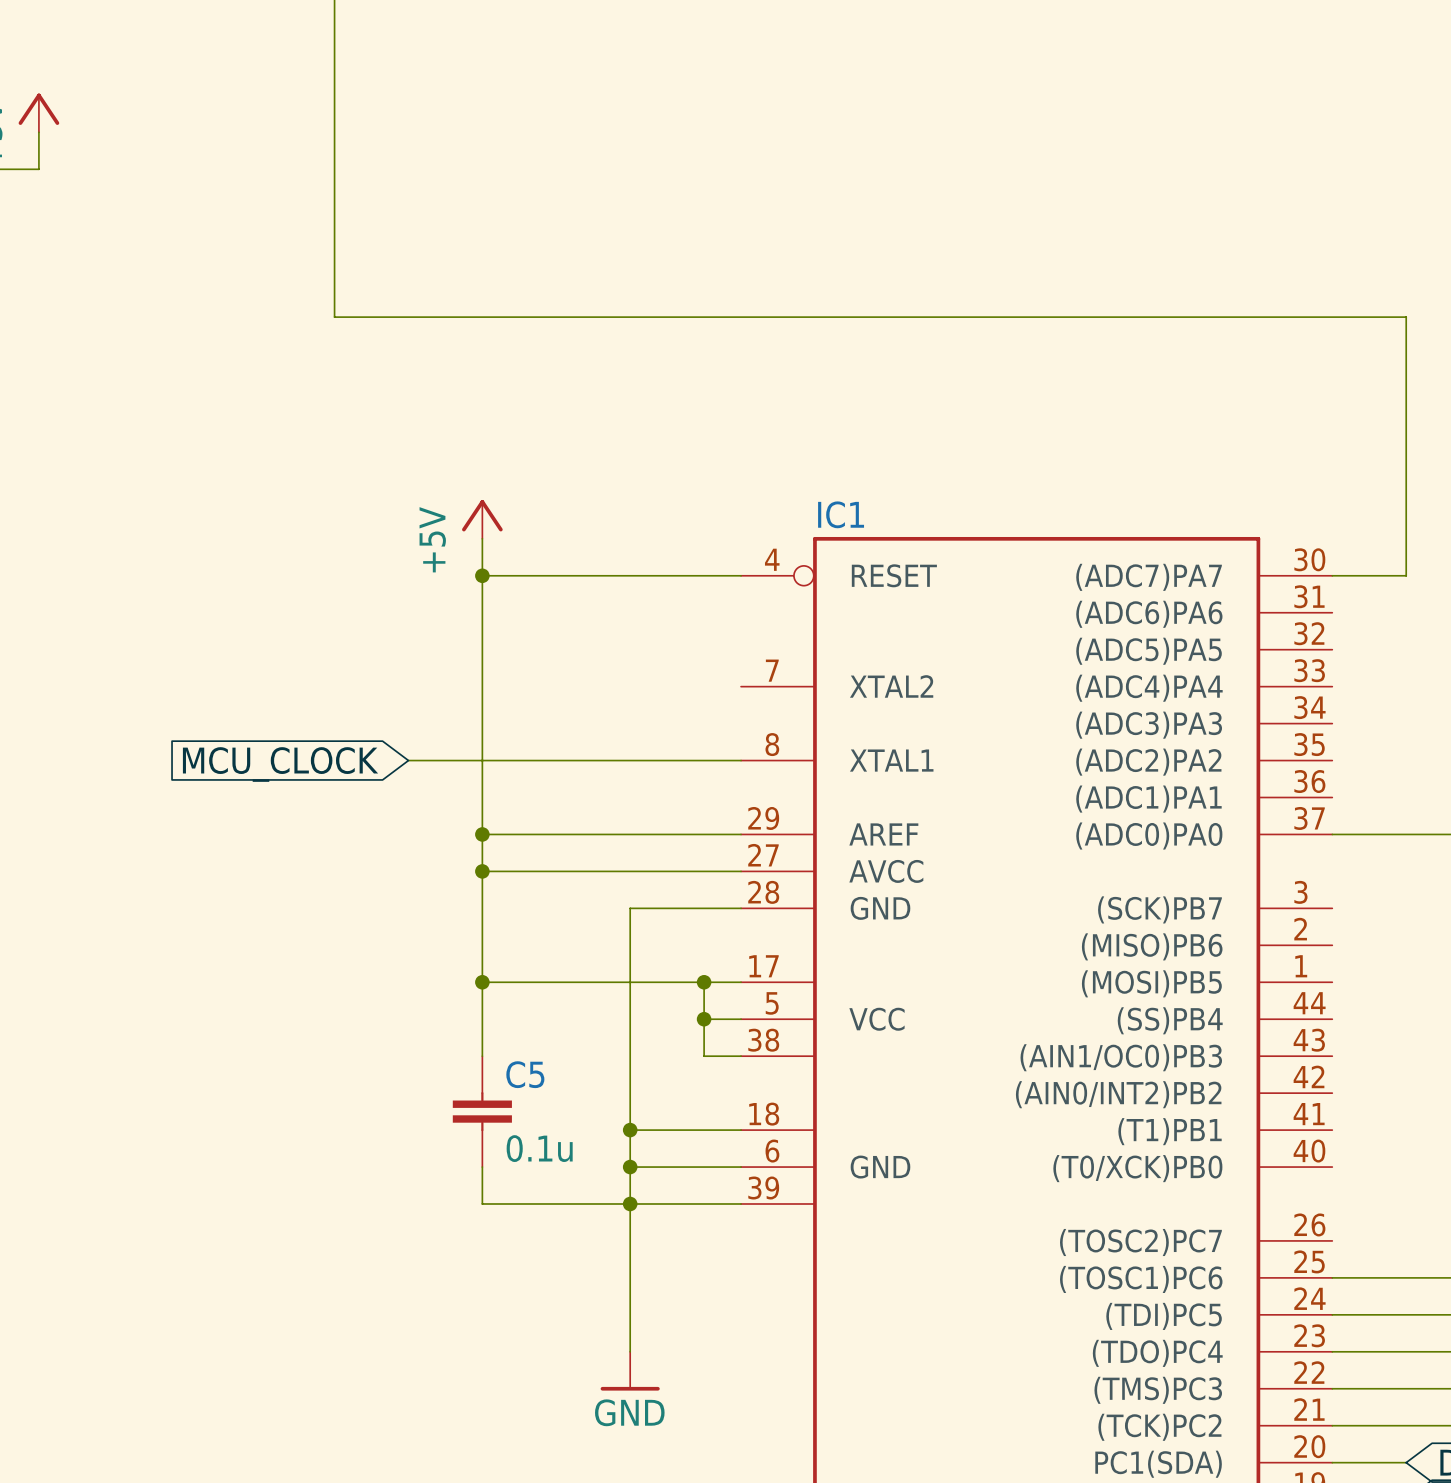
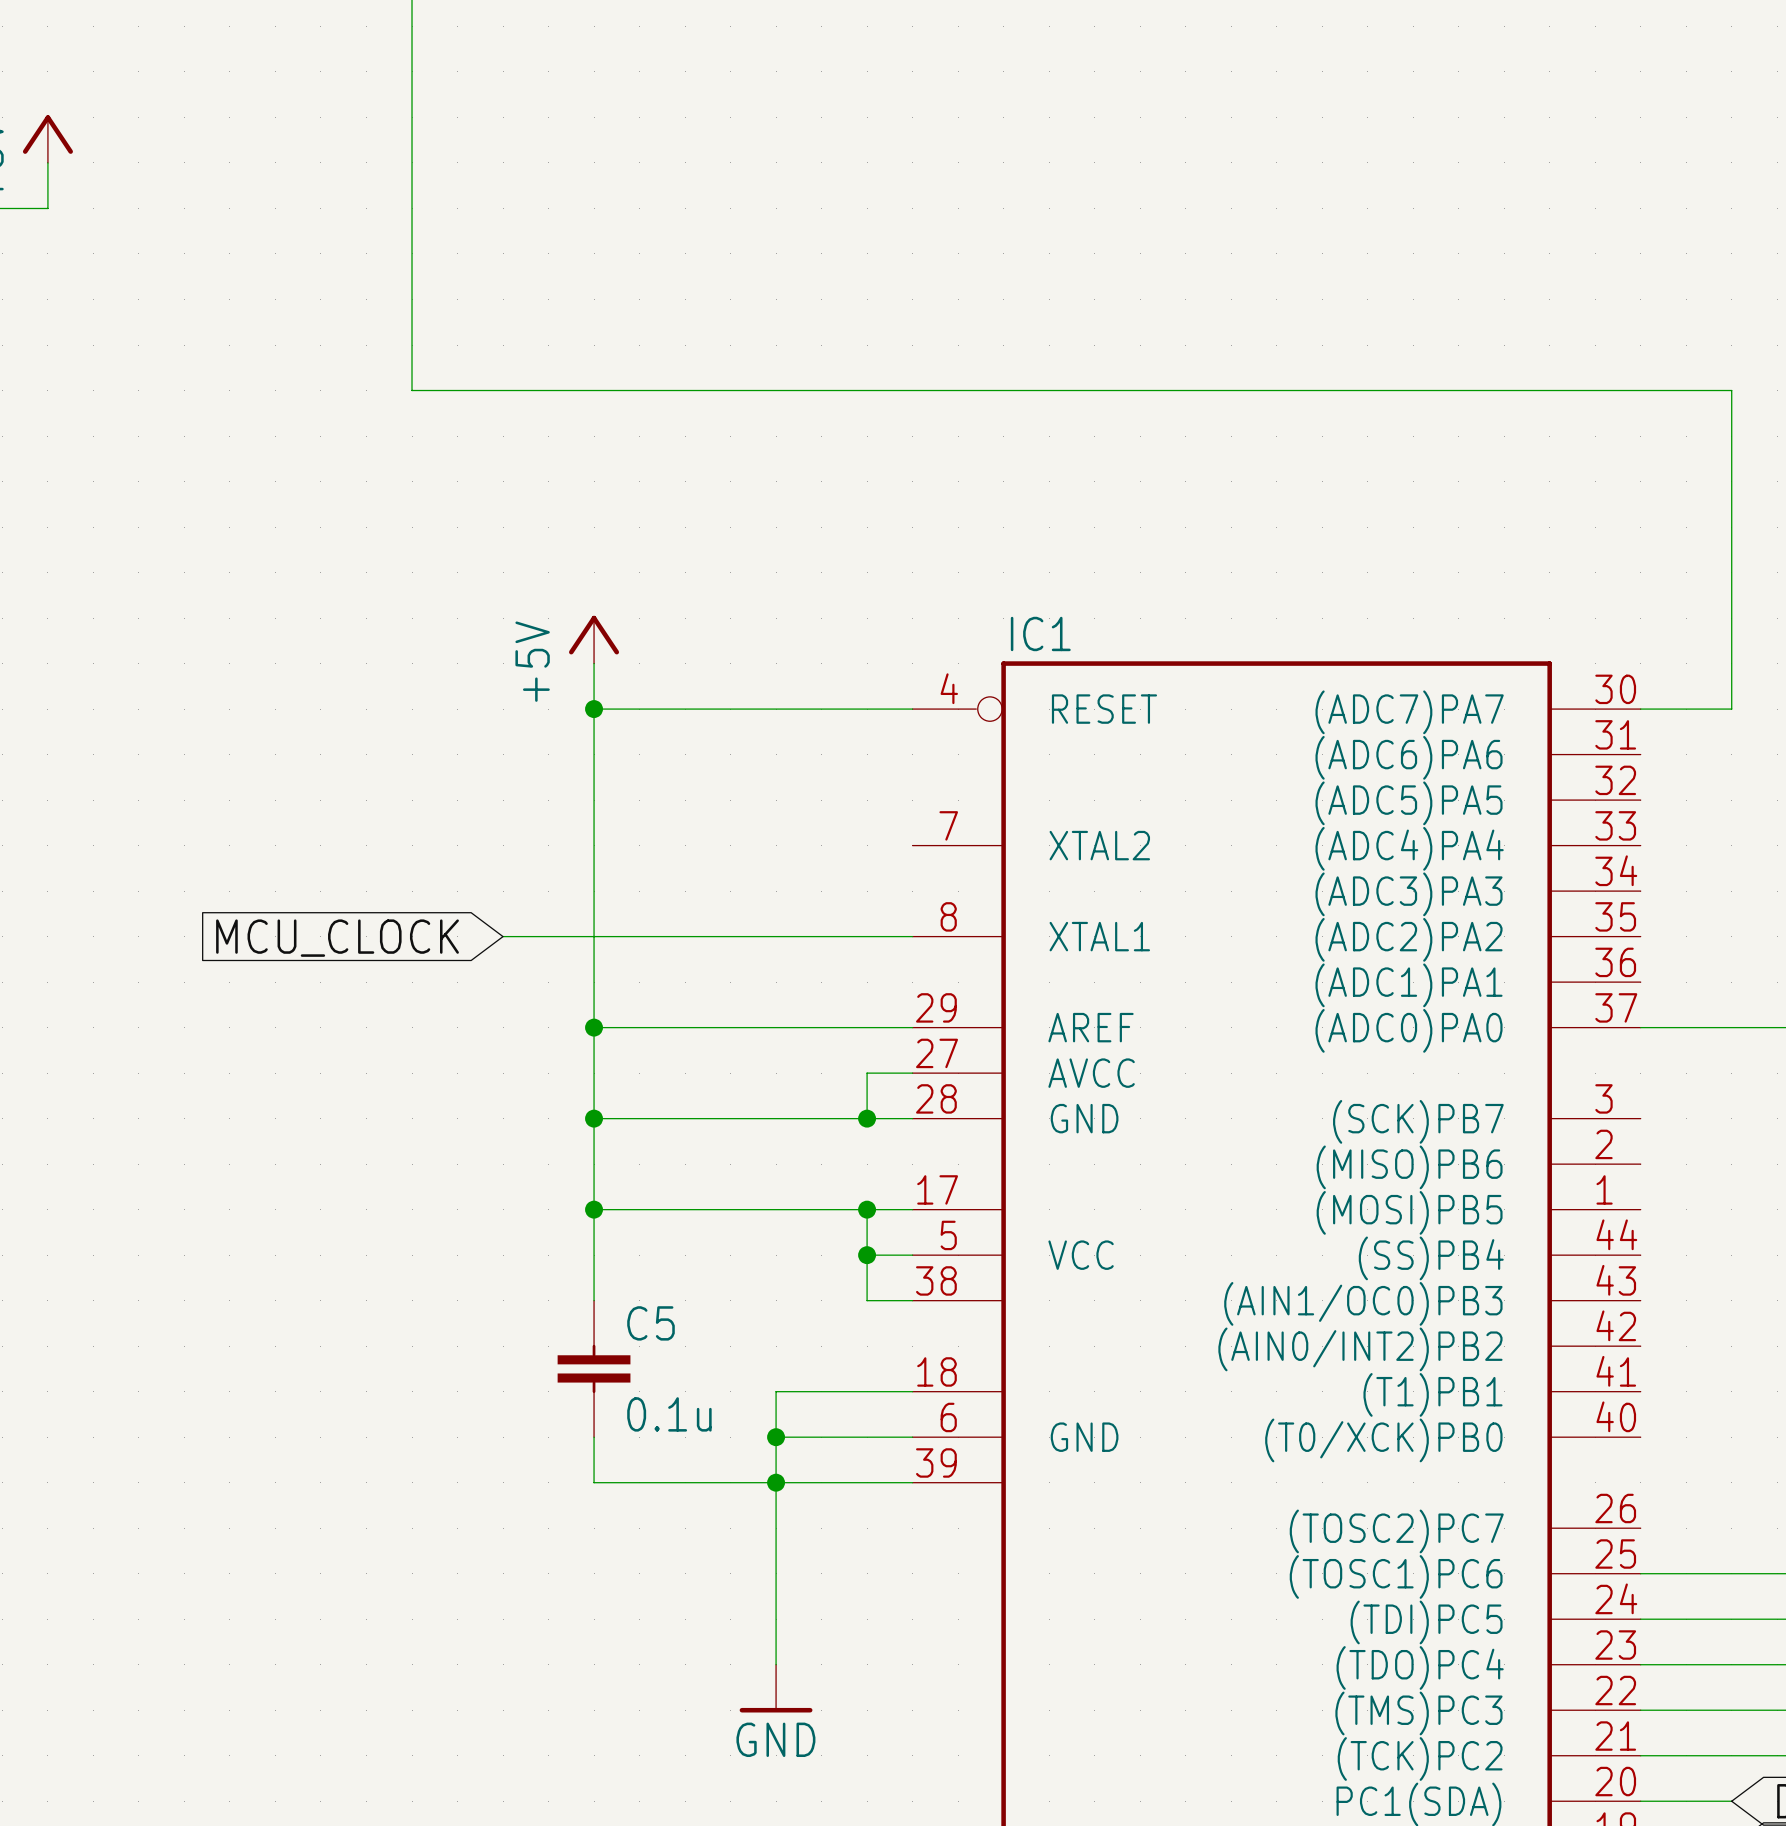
wire: (482, 871) (704, 871) -> (867, 1118) (867, 1073)
junction position: (482, 871) -> (594, 1118)
wire: (630, 908) (630, 1130) -> (776, 1118) (594, 1118)
junction: none -> (867, 1118)
junction: (630, 1130) -> none

